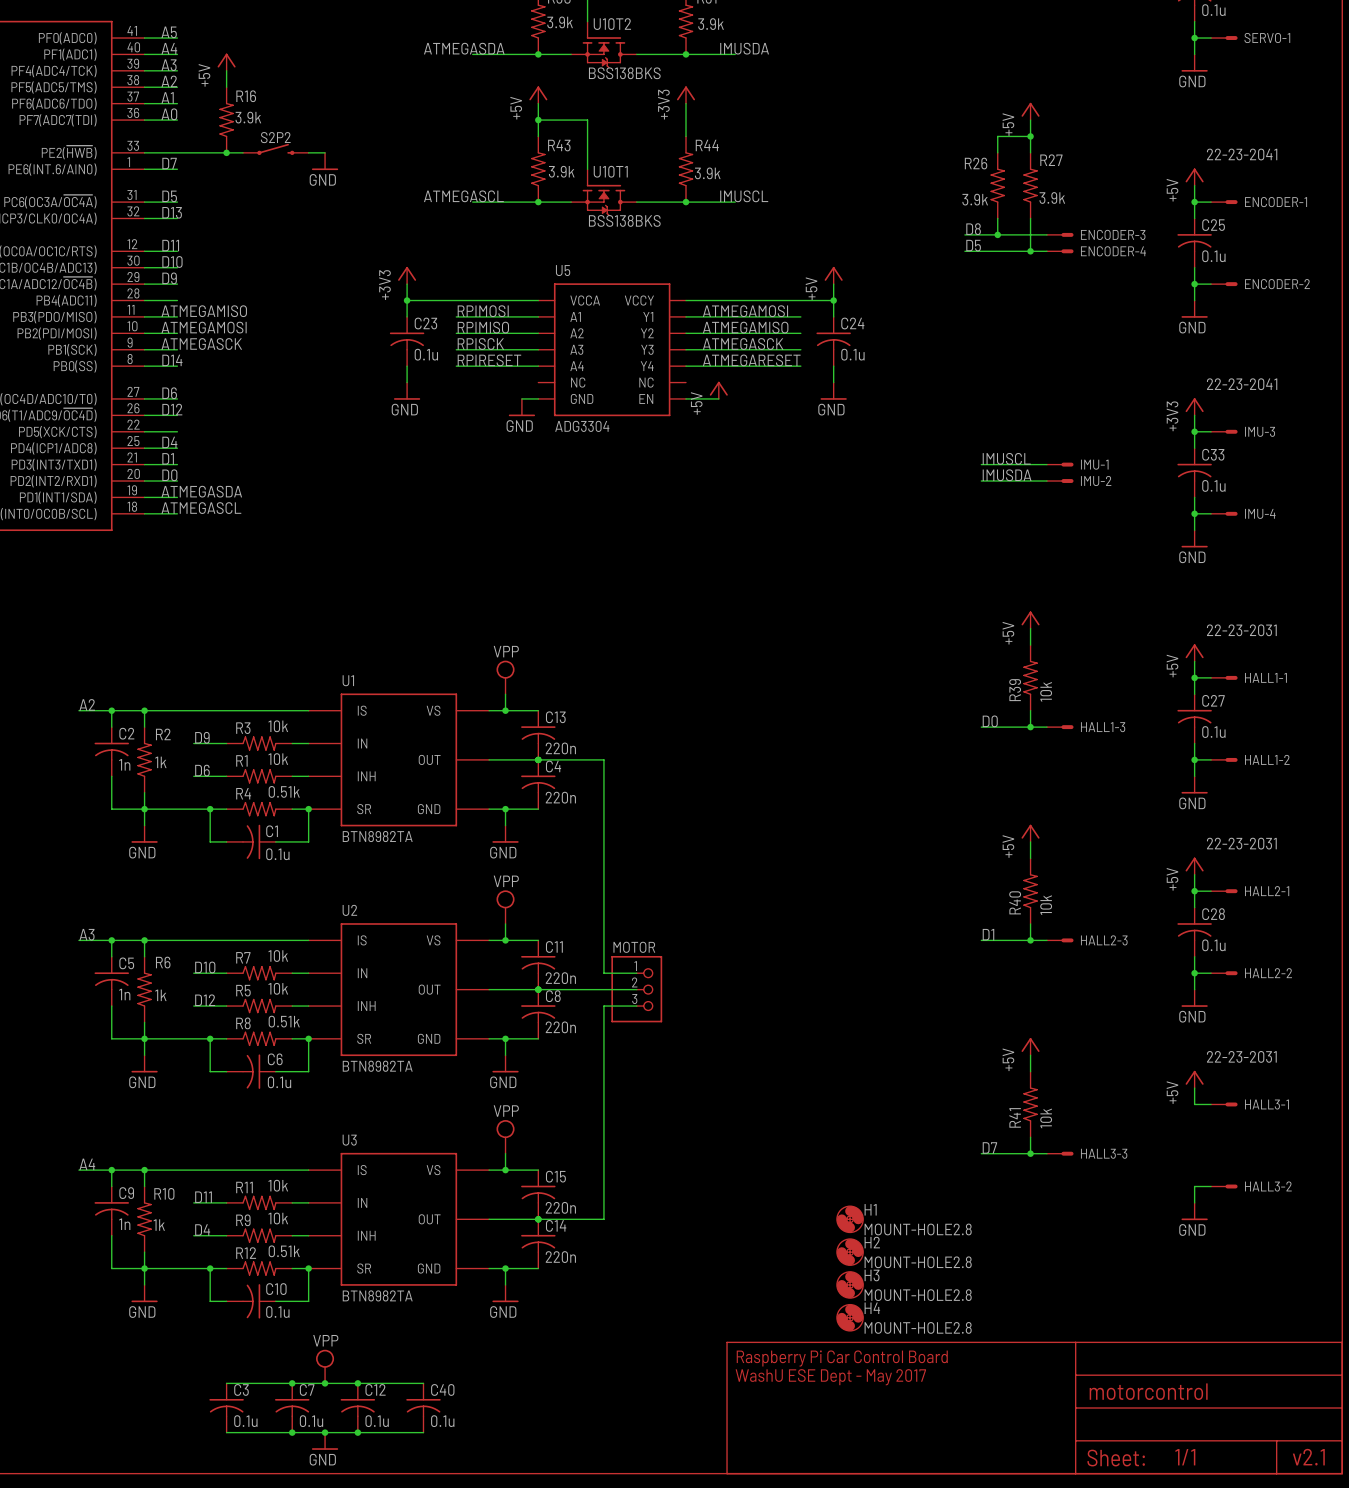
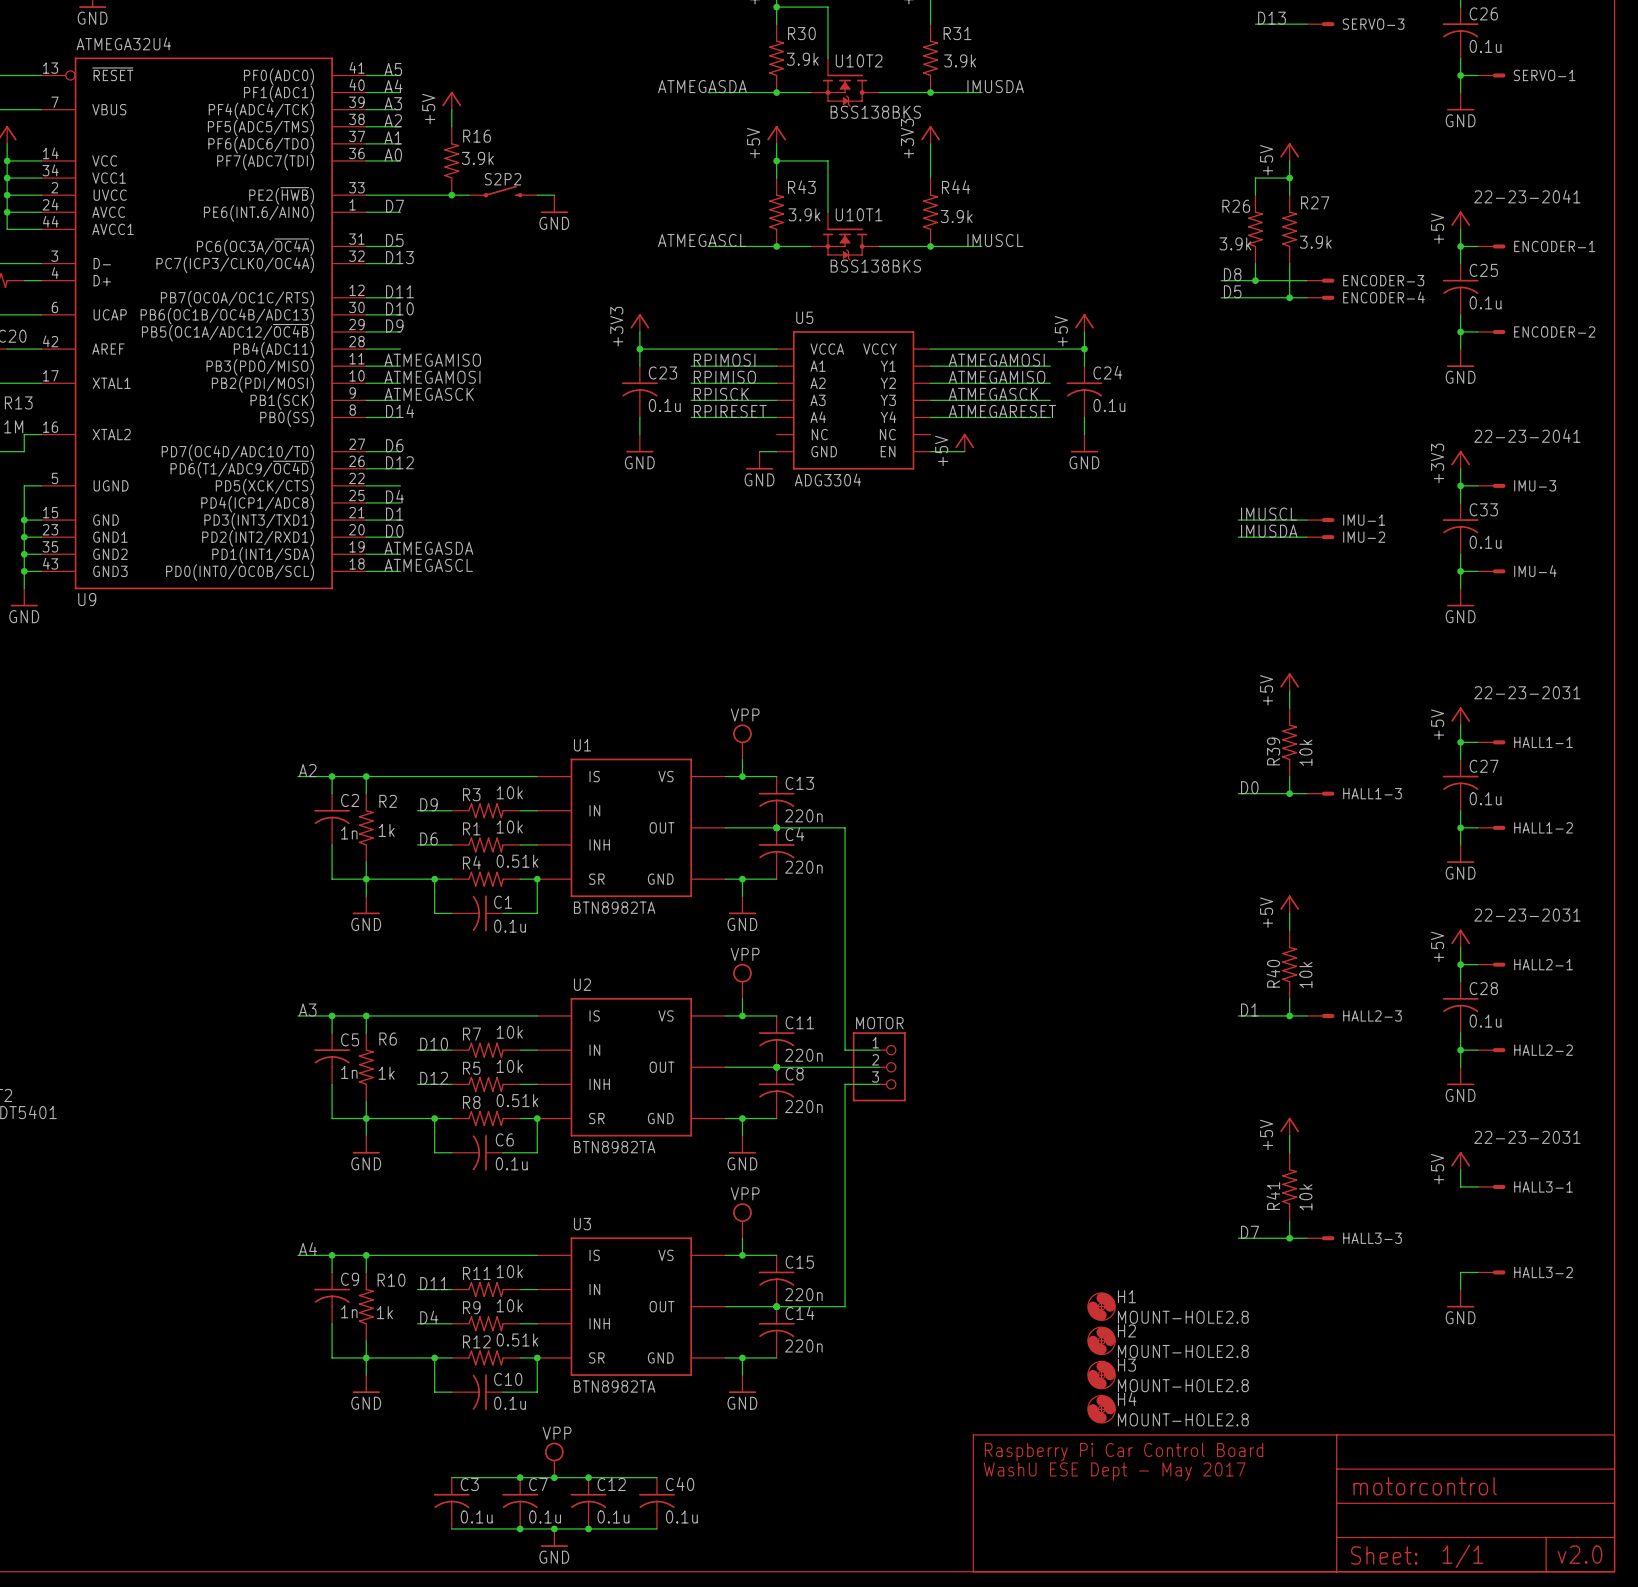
text: v2.1 (1308, 1457) -> v2.0 (1580, 1554)

